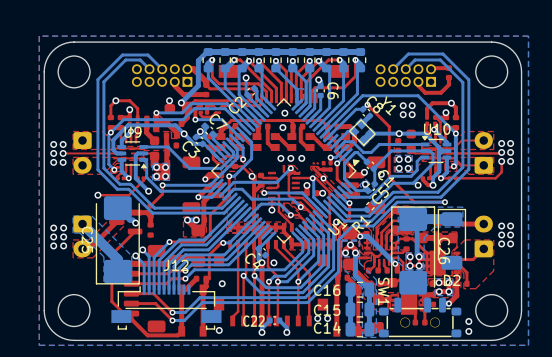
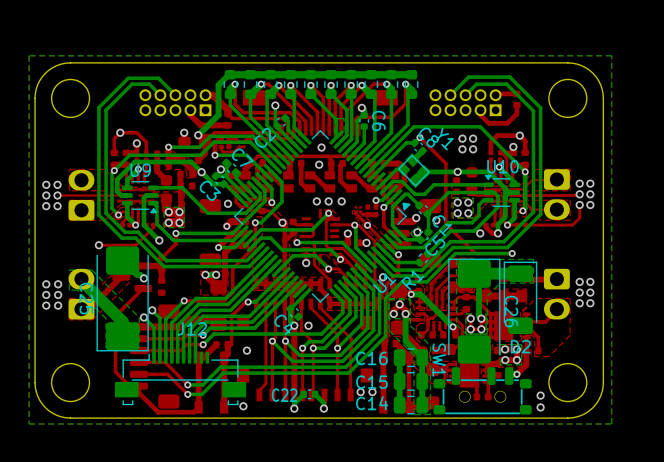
part footprint: [73, 132, 92, 174] -> [68, 169, 95, 221]
part footprint: [474, 132, 493, 174] -> [543, 169, 570, 220]
part footprint: [73, 215, 92, 258] -> [68, 268, 95, 320]
part footprint: [474, 215, 493, 258] -> [543, 268, 570, 320]

